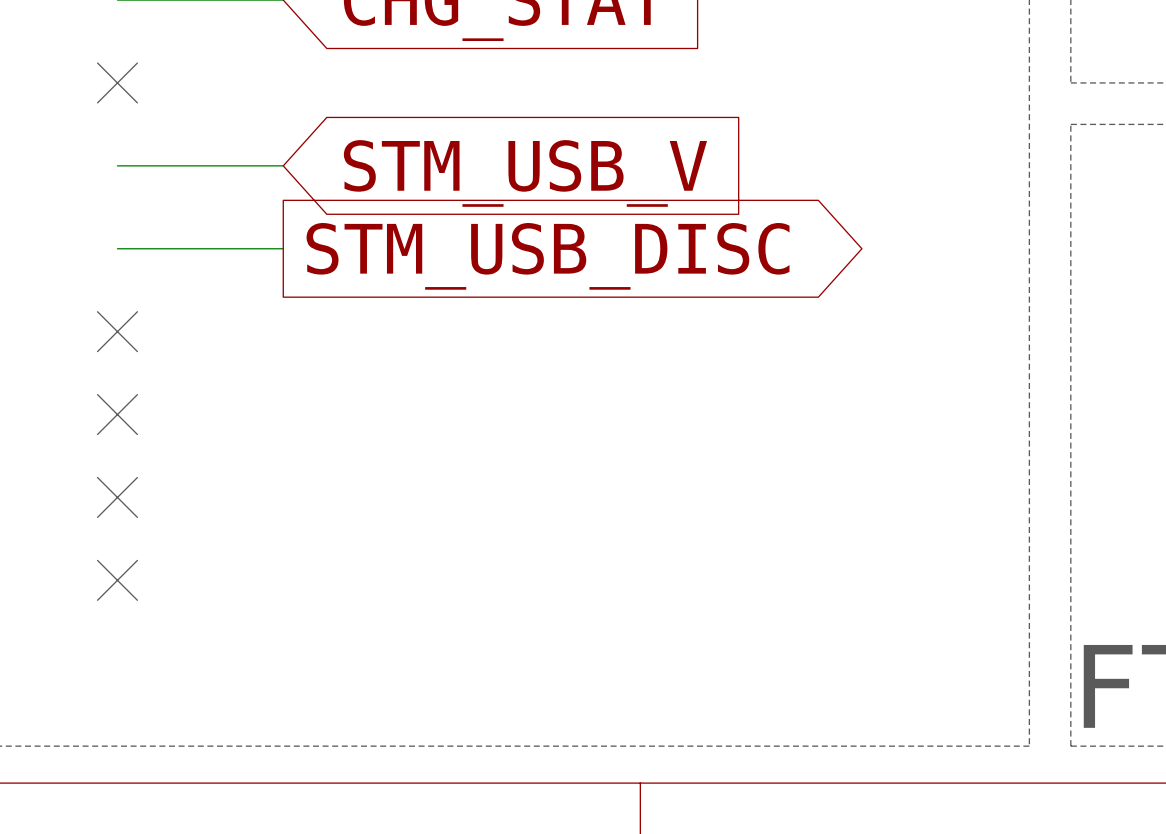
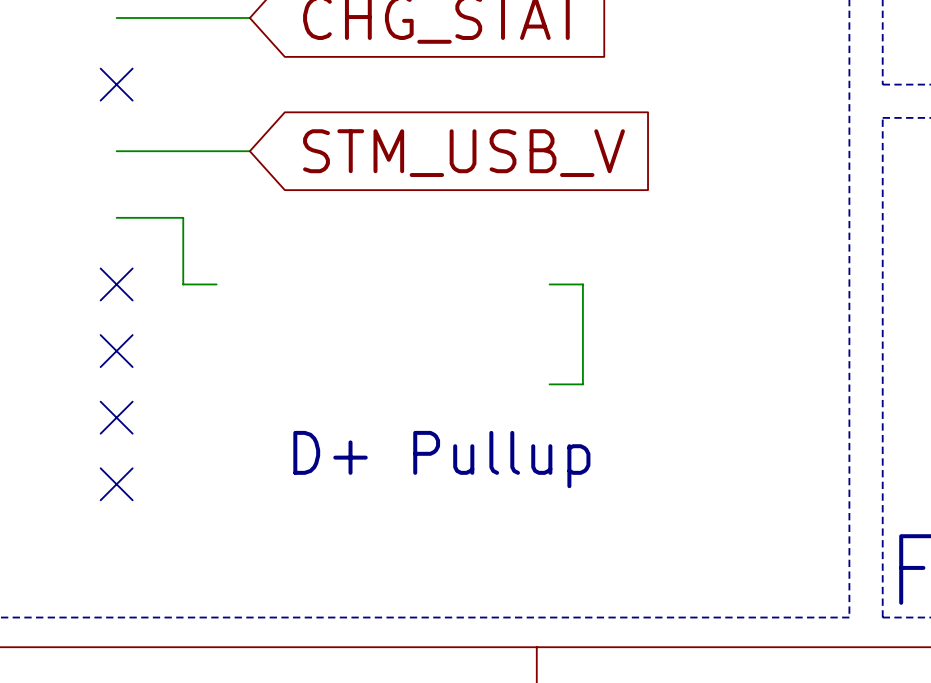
wire: (200, 248) (283, 248) -> (183, 217) (183, 284) (216, 284)
global label: STM_USB_DISC (548, 256) -> none
wire: none -> (549, 284) (582, 284) (582, 384) (549, 384)
text: none -> D+ Pullup (441, 459)

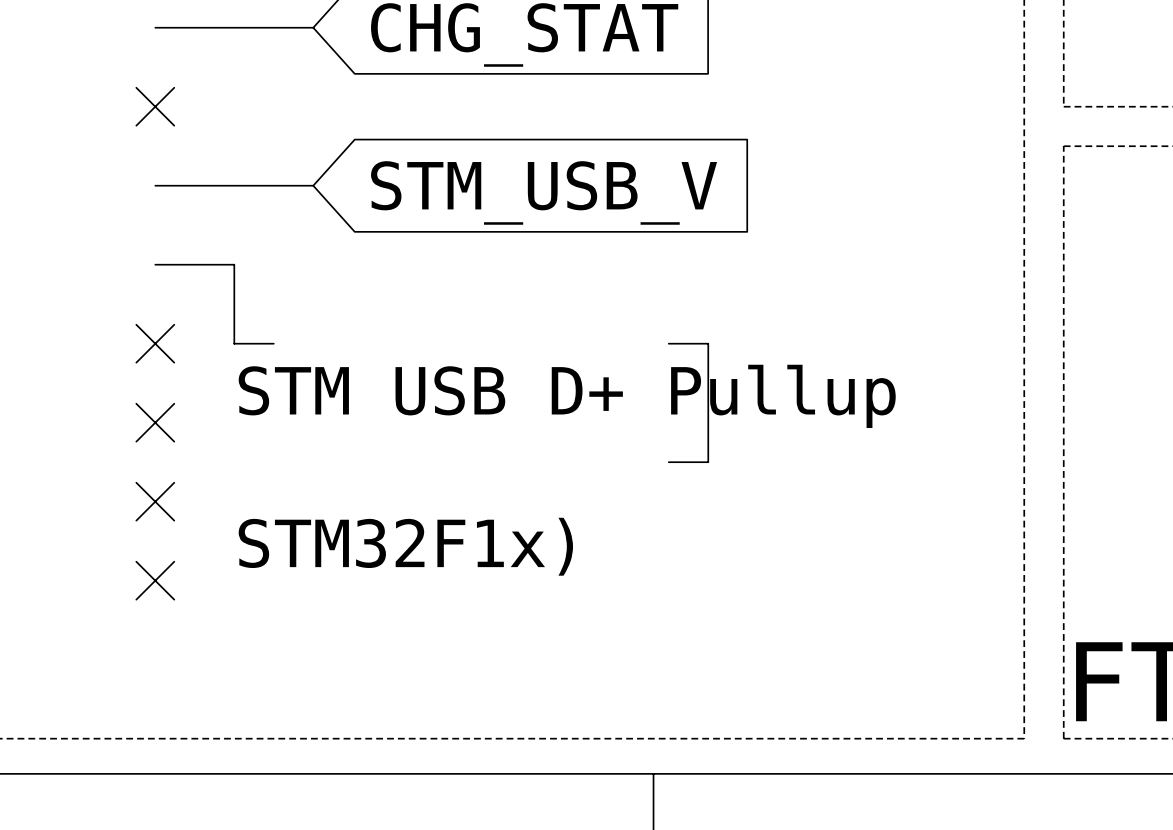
text: none -> STM USB D+ Pullup (567, 396)
text: none -> STM32F1x) (405, 546)
text: D+ Pullup (441, 459) -> none

